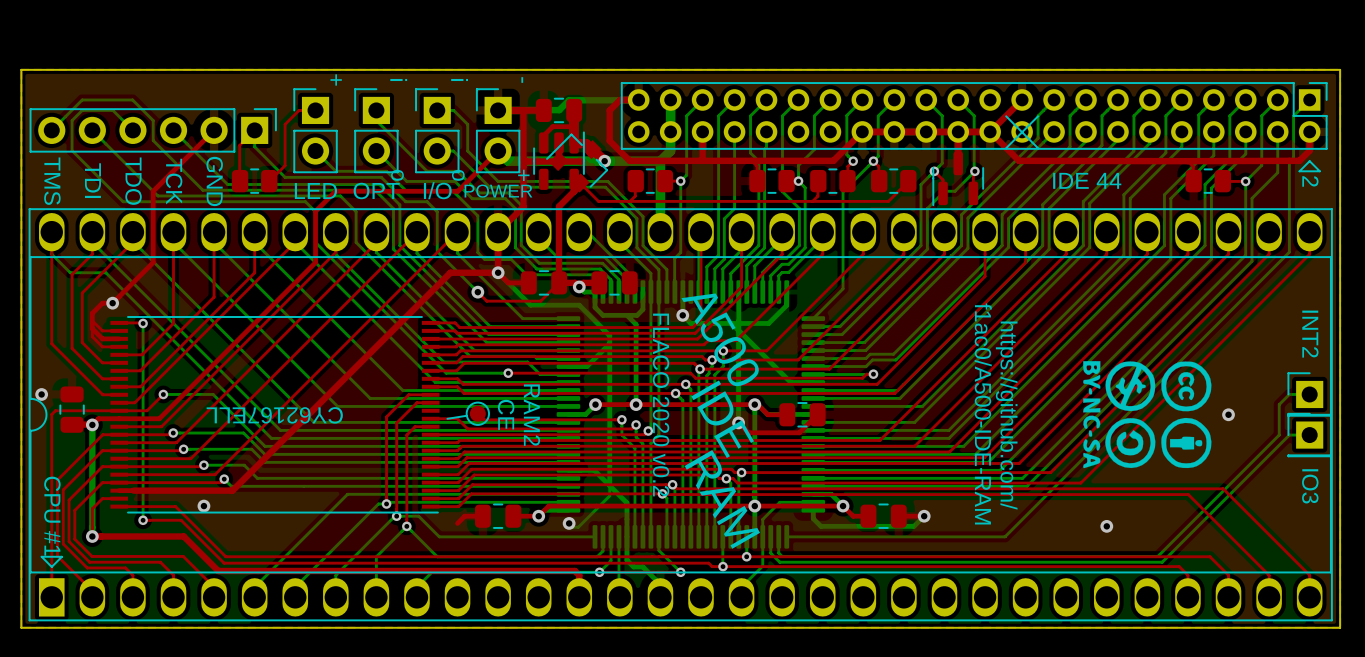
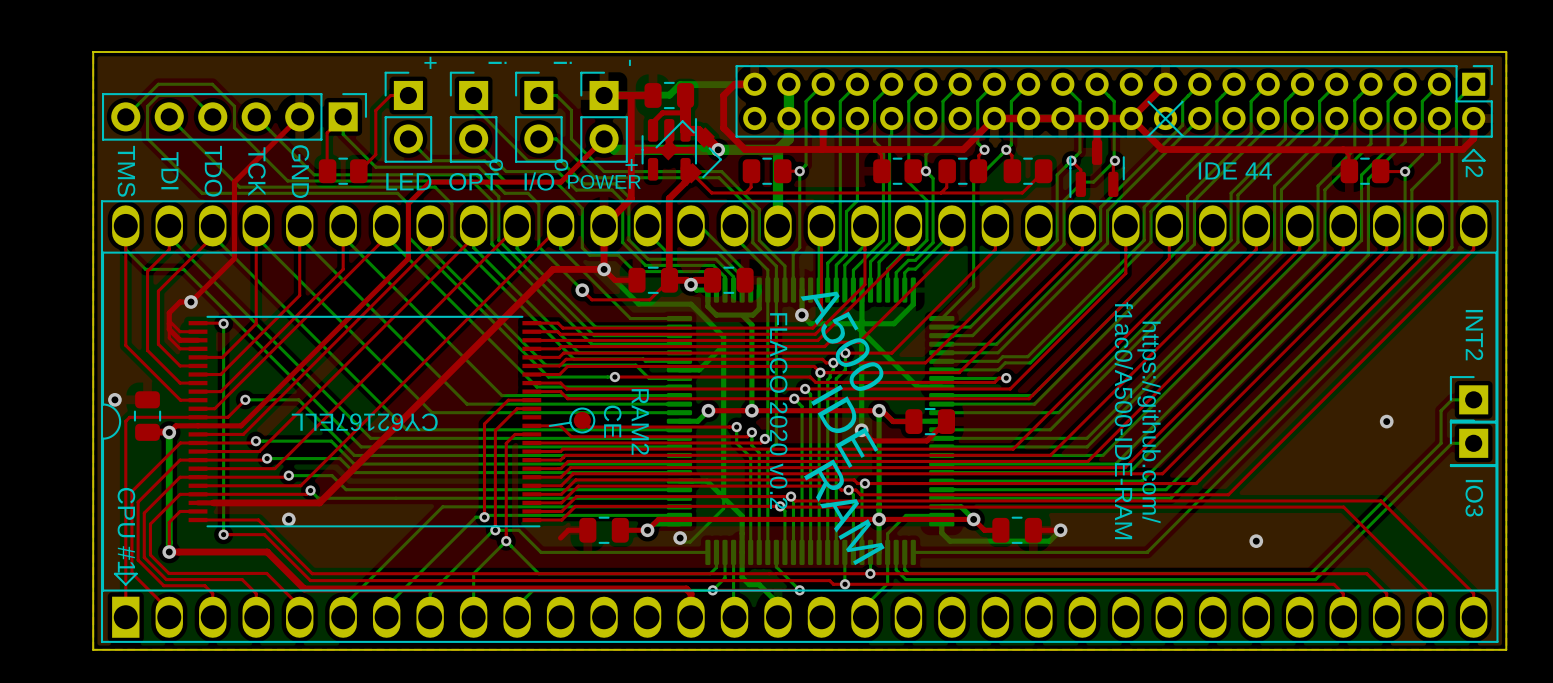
drawing: [1083, 361, 1212, 469] -> none

